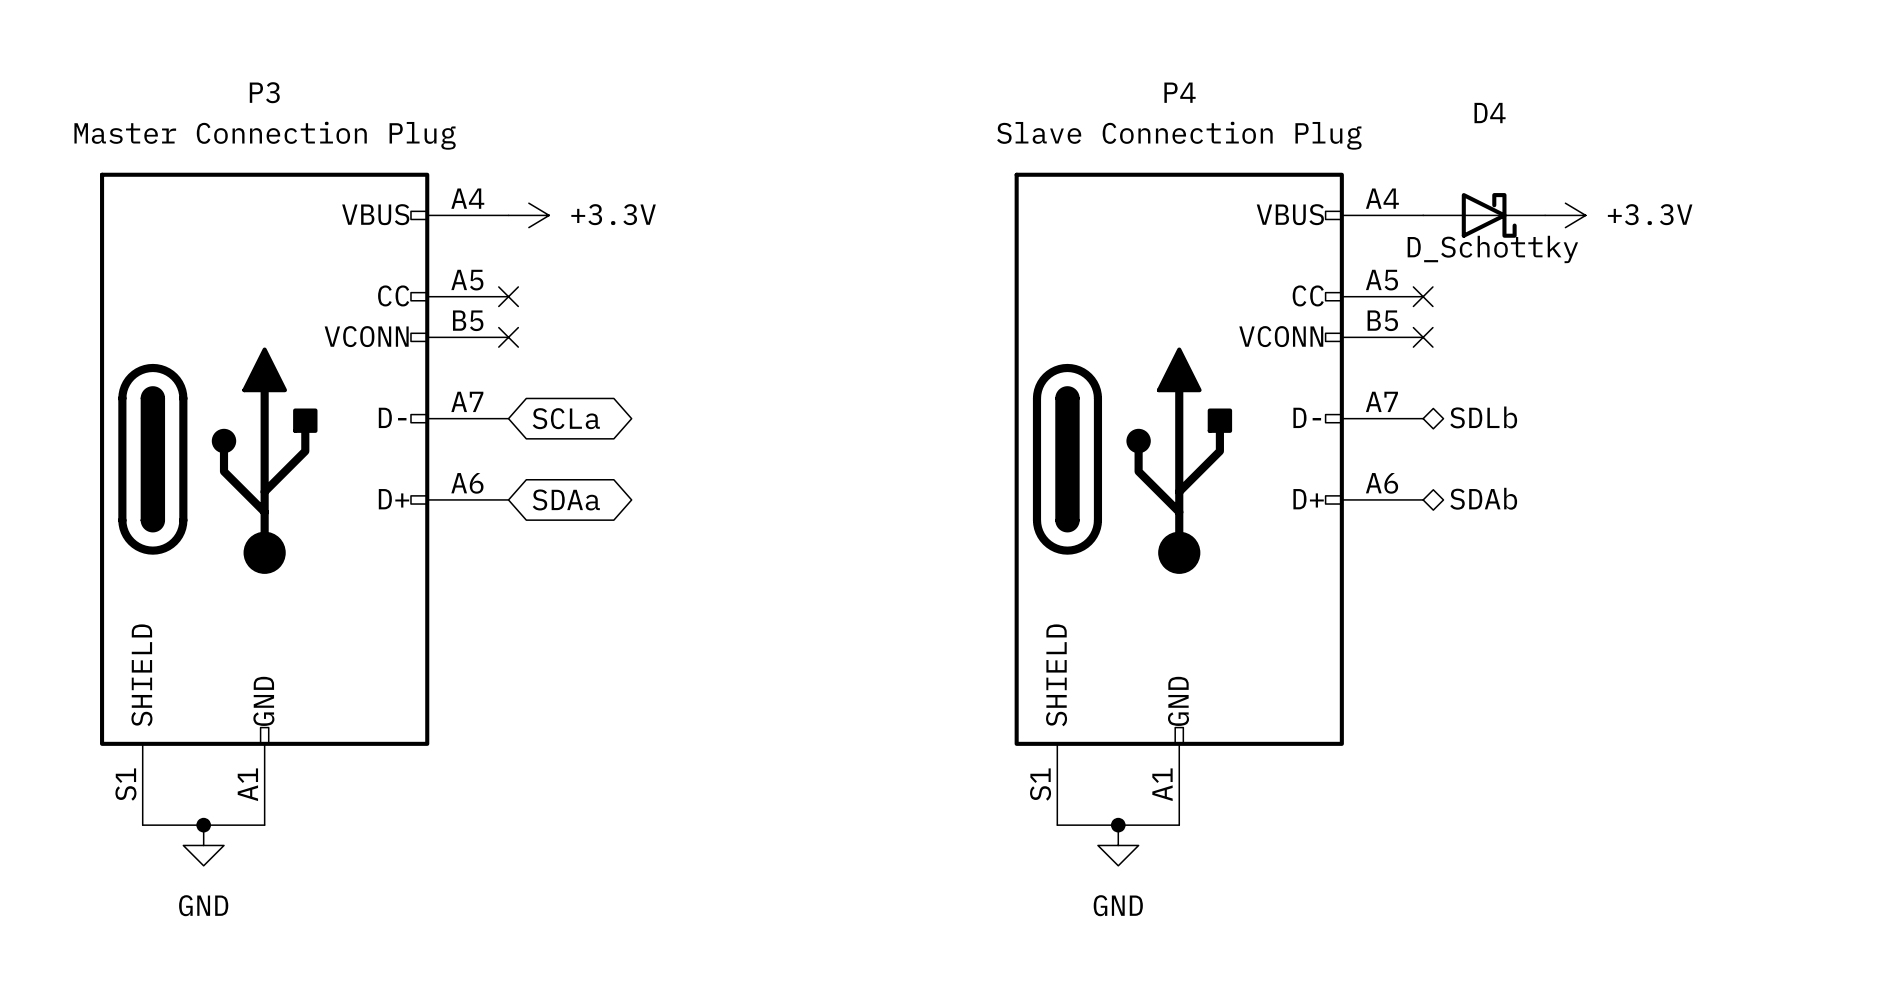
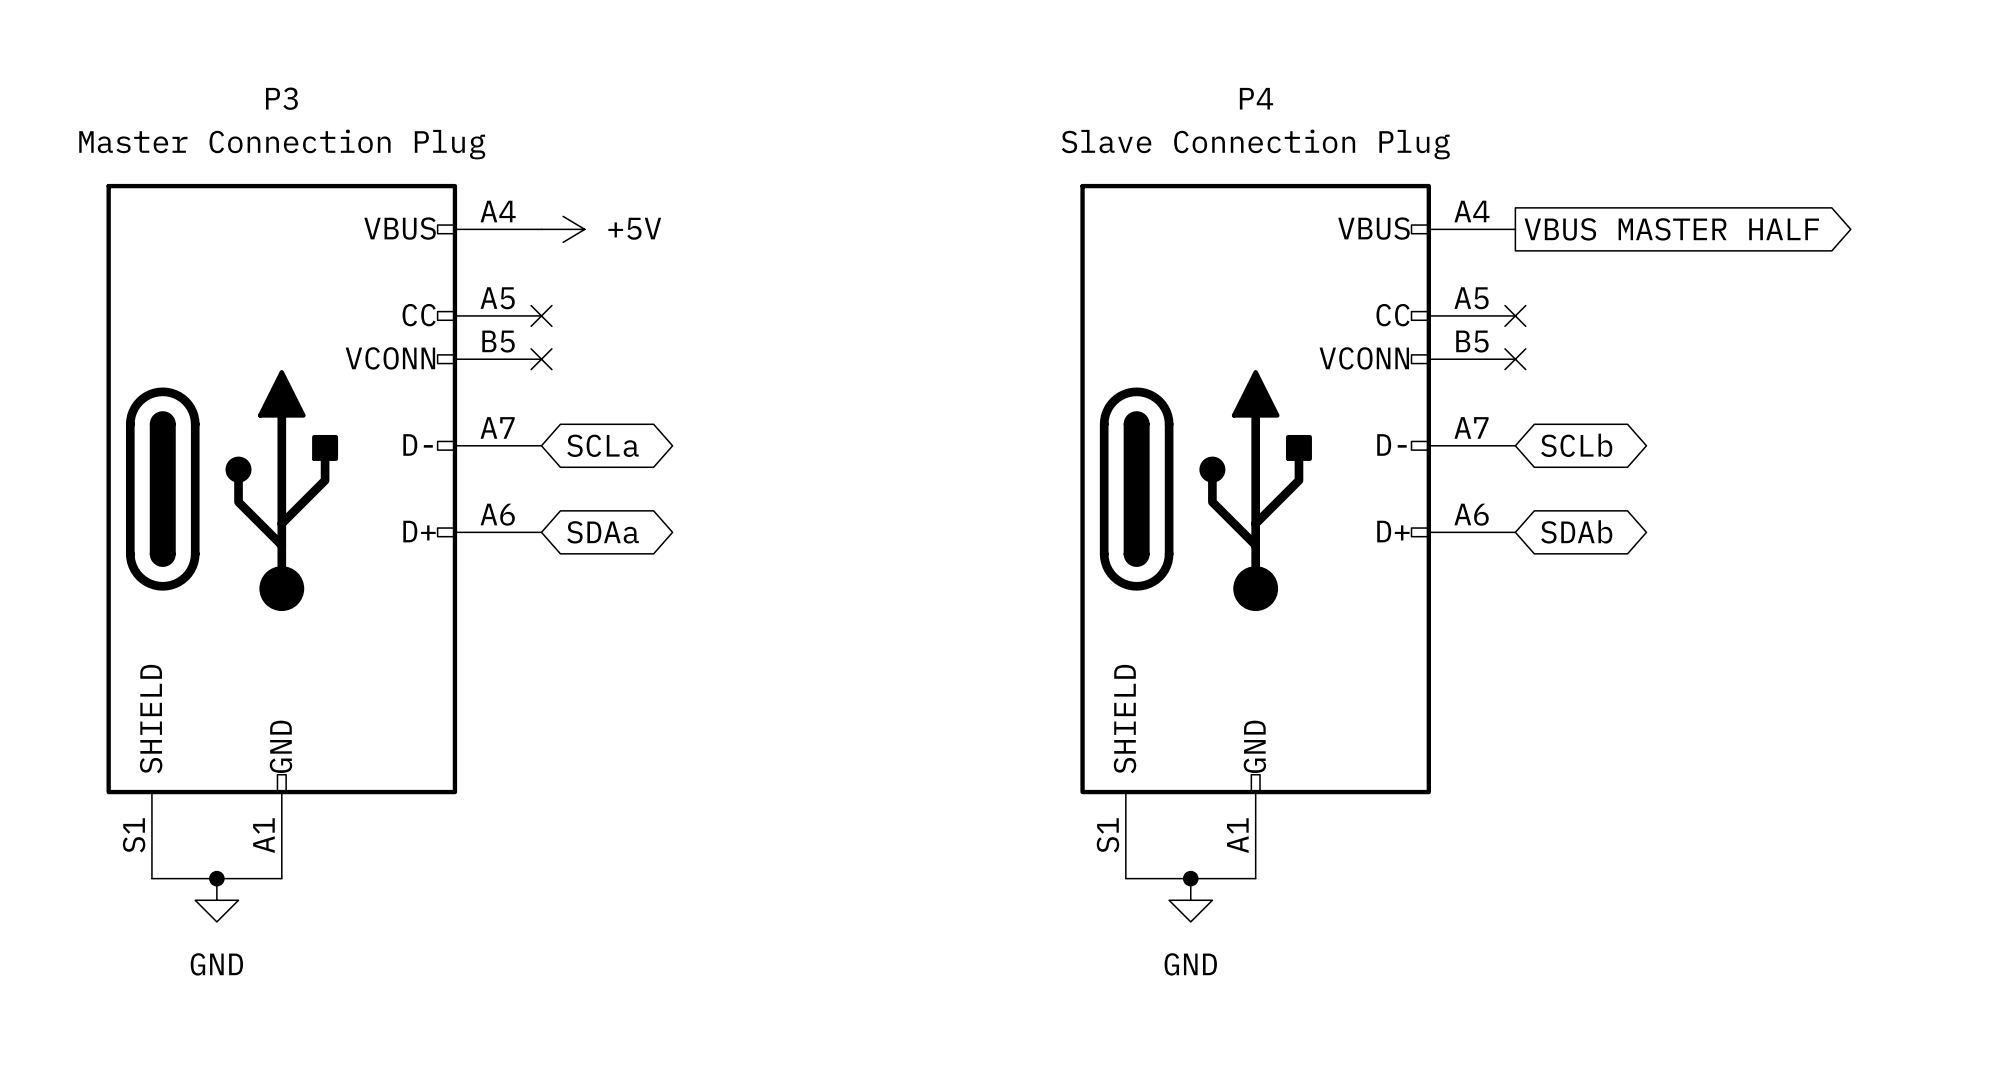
power symbol: +3.3V (528, 215) -> +5V (563, 229)
D4: D_Schottky (1484, 215) -> none
power symbol: +3.3V (1565, 215) -> none
global label: none -> VBUS MASTER HALF (1671, 229)
hierarchical label: SDLb (1483, 417) -> none
global label: none -> SCLb (1576, 445)
hierarchical label: SDAb (1483, 498) -> none
global label: none -> SDAb (1576, 531)

